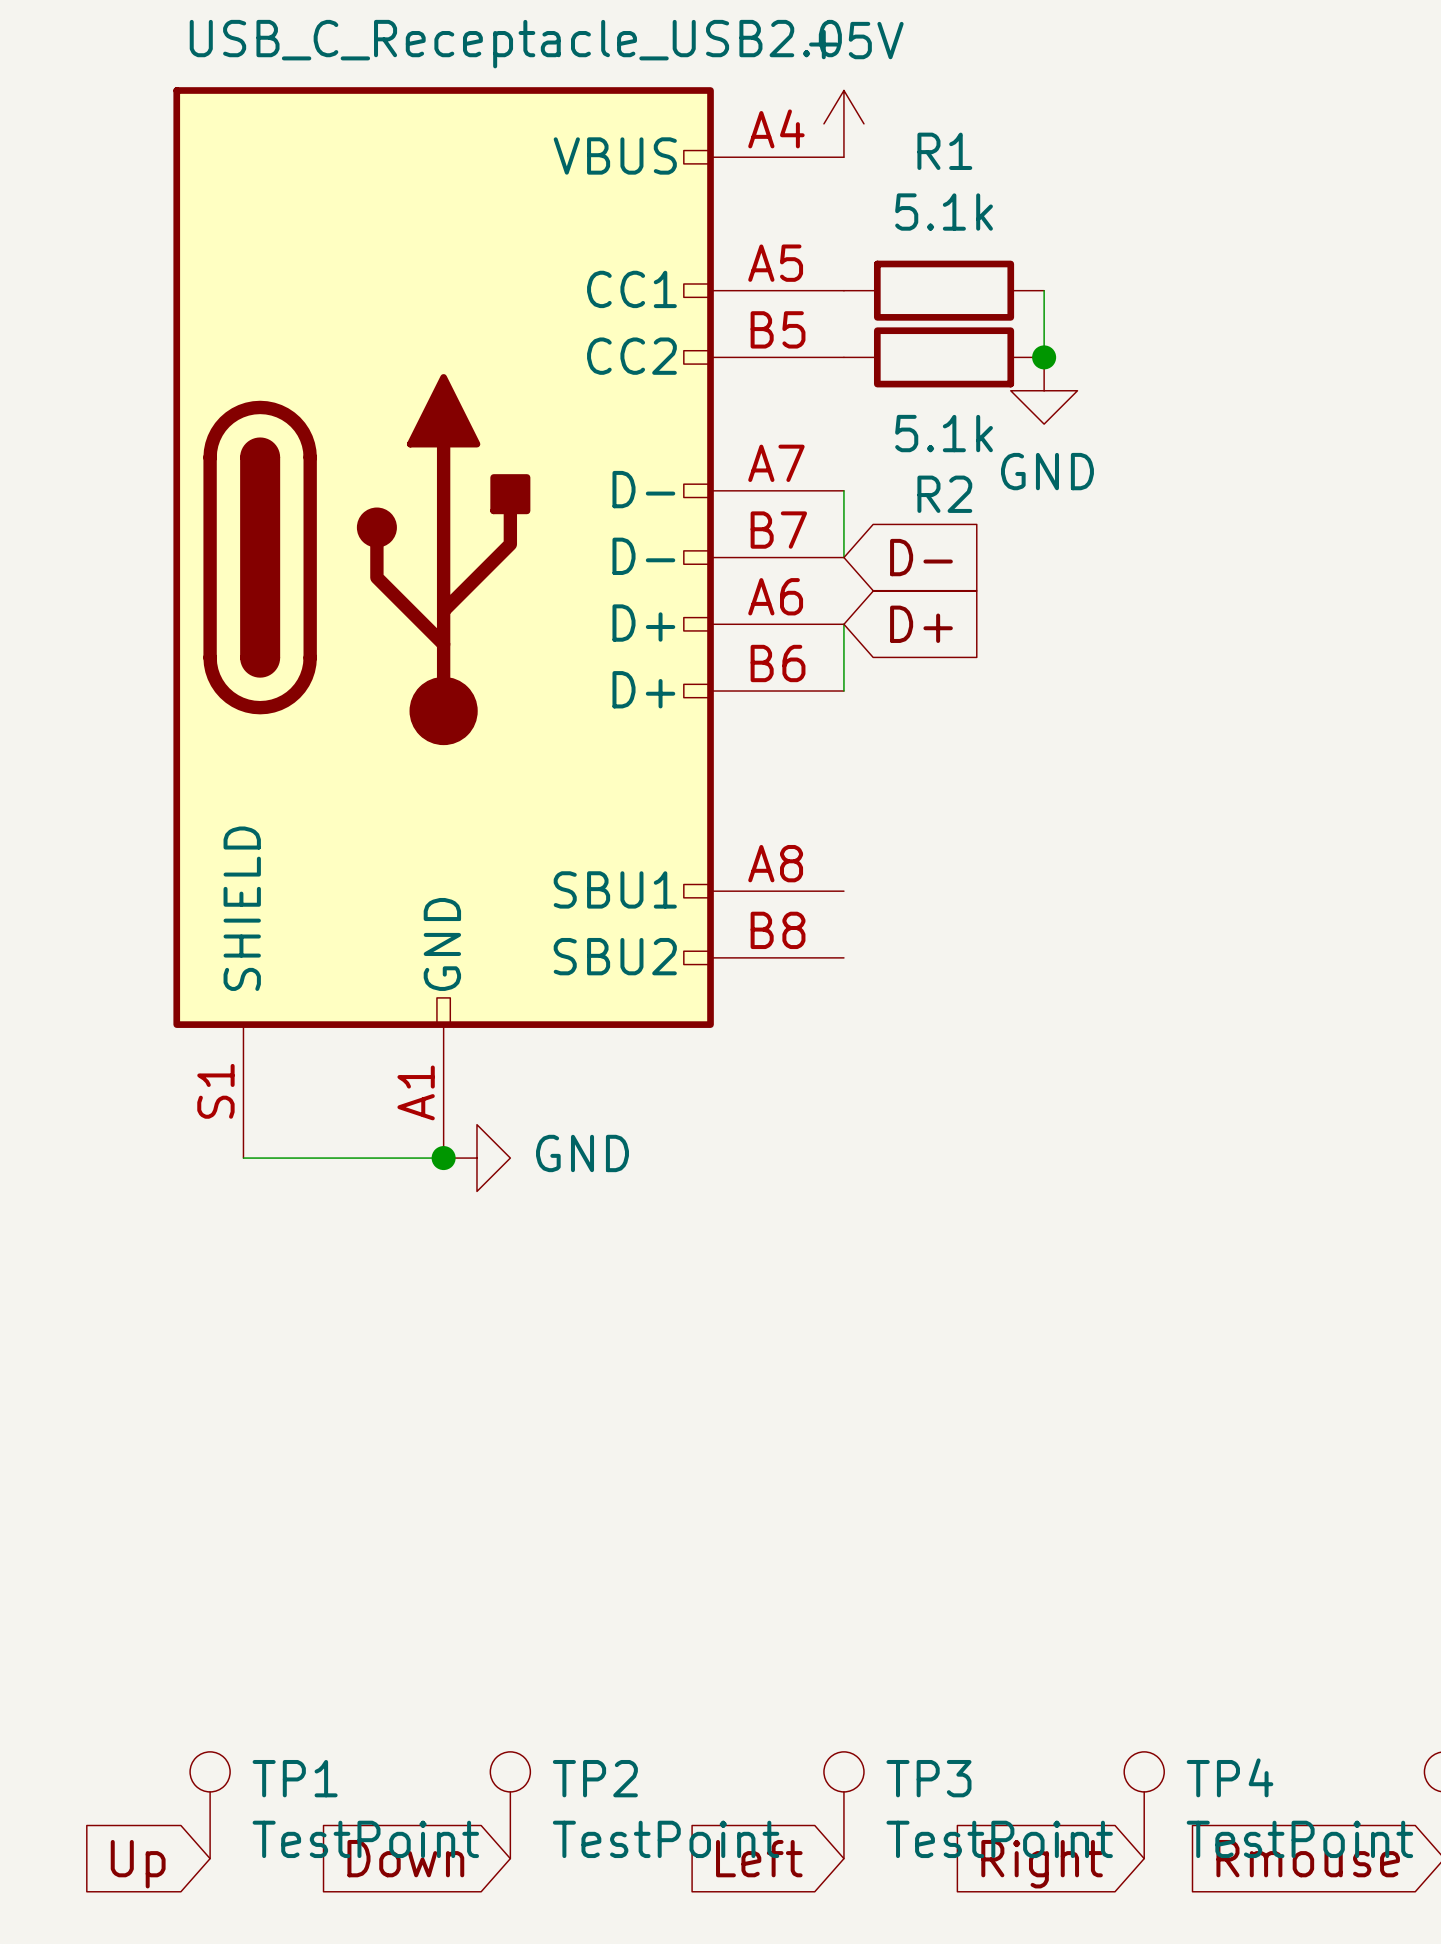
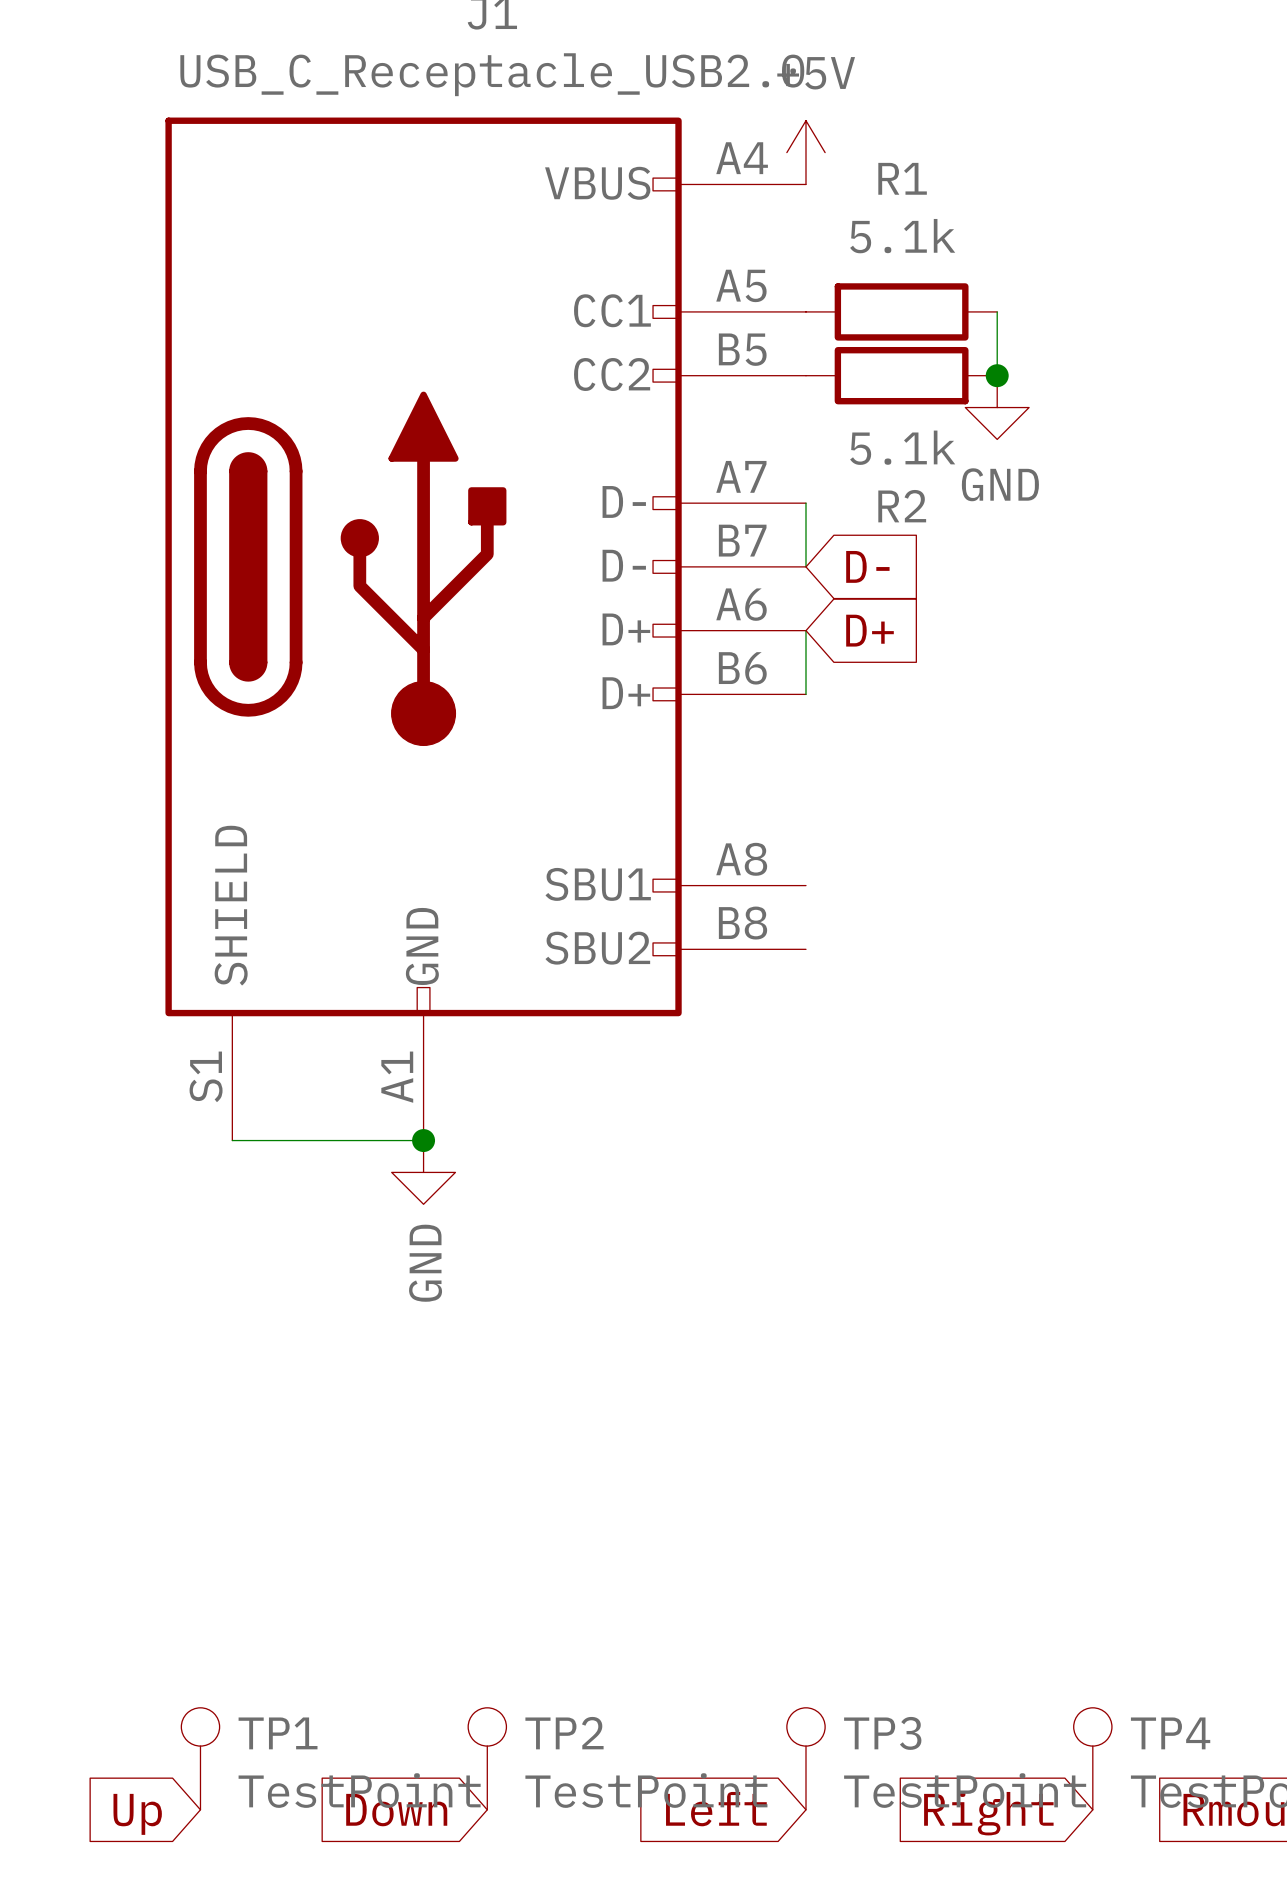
power symbol rotation: 0° (476, 1158) -> 90° clockwise (423, 1172)
power symbol position: GND (476, 1158) -> GND (423, 1172)

